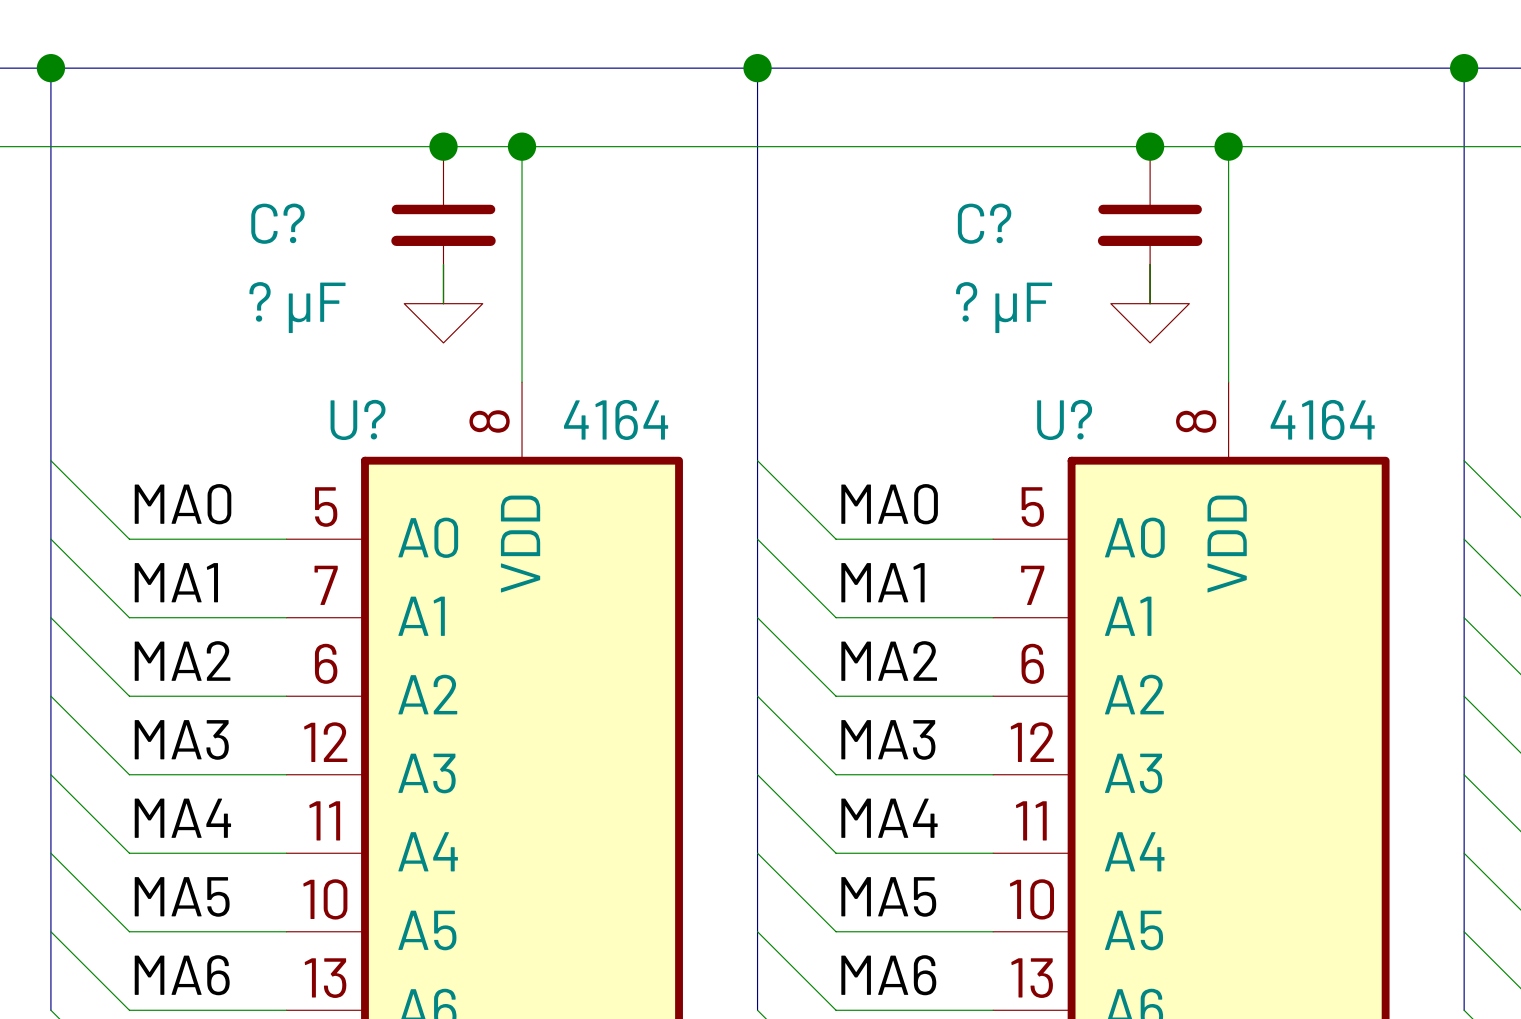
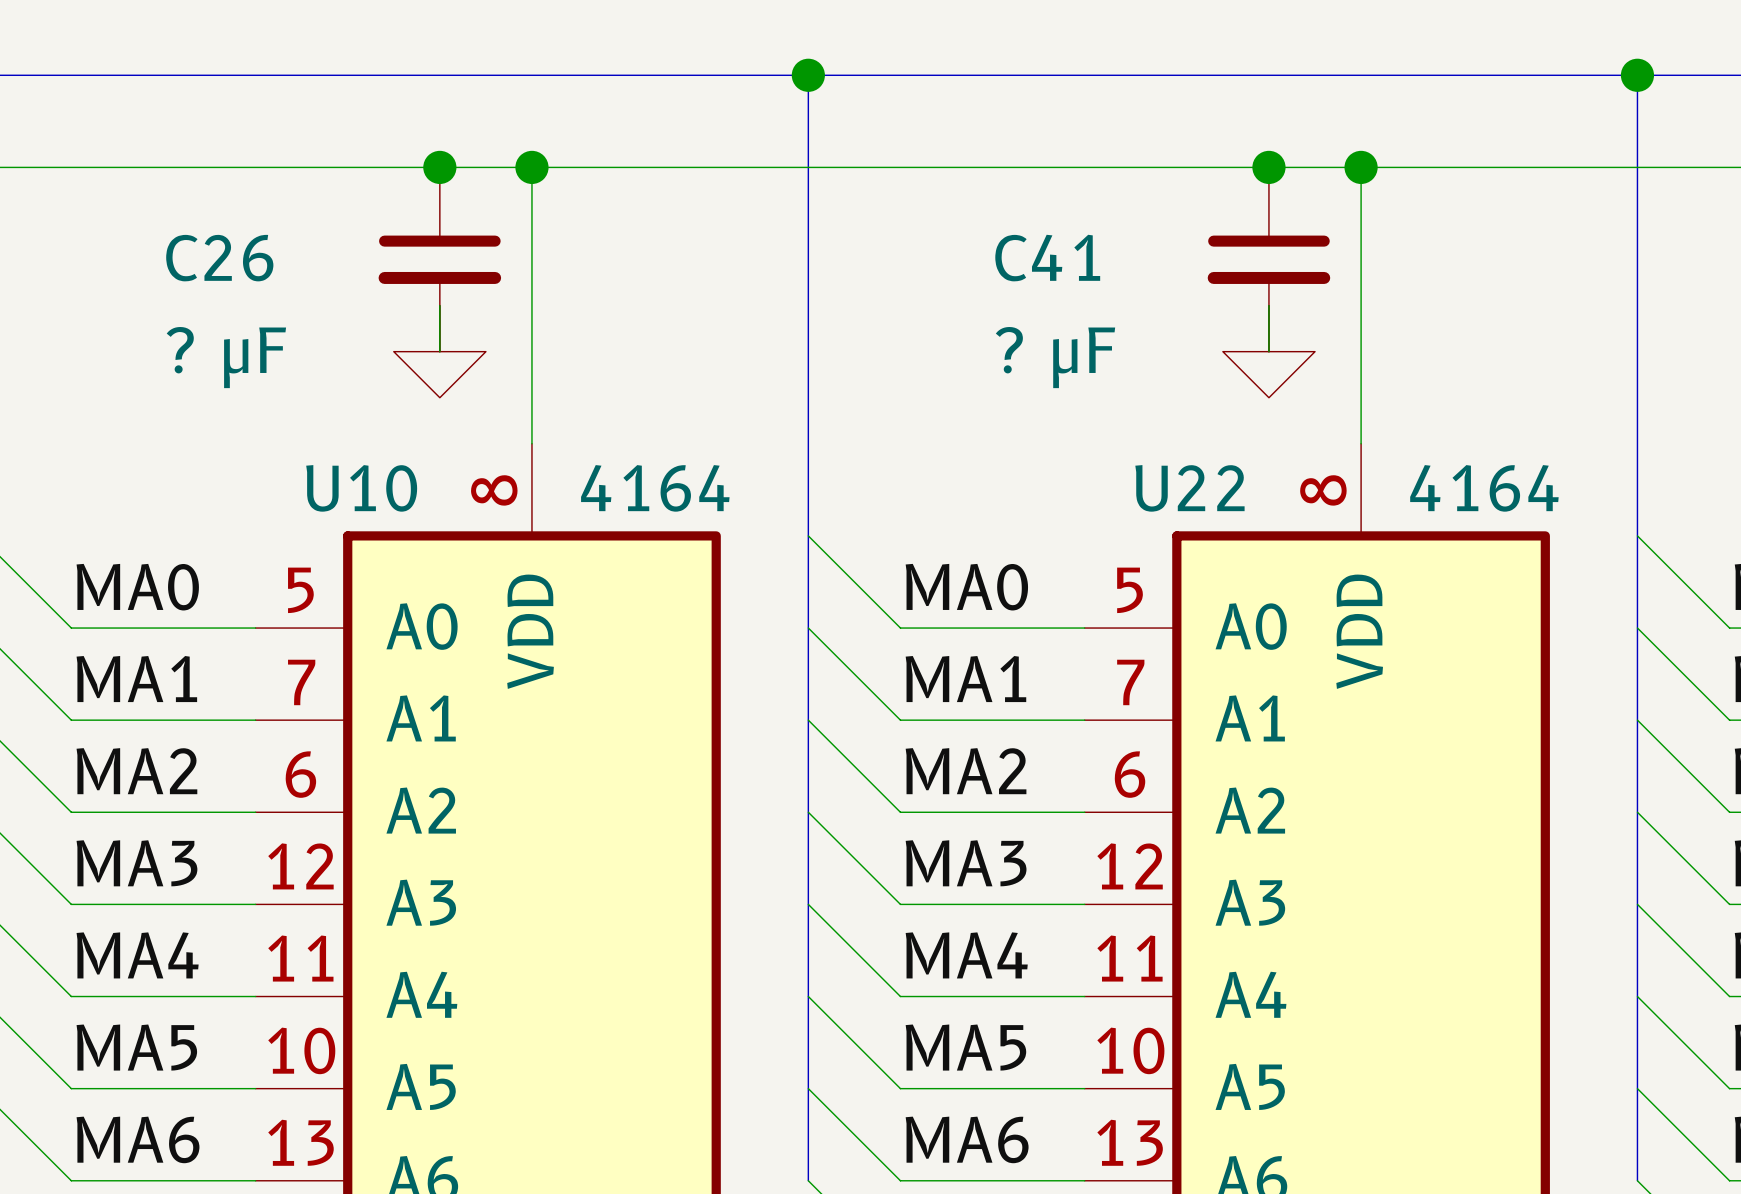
C? name: C? (277, 223) -> C26 (219, 258)
C? name: C? (984, 223) -> C41 (1047, 258)
C? value position: ? μF (297, 307) -> ? μF (226, 357)
C? value position: ? μF (1004, 307) -> ? μF (1055, 357)
U? name: U? (358, 419) -> U10 (361, 488)
U? name: U? (1064, 419) -> U22 (1189, 488)

